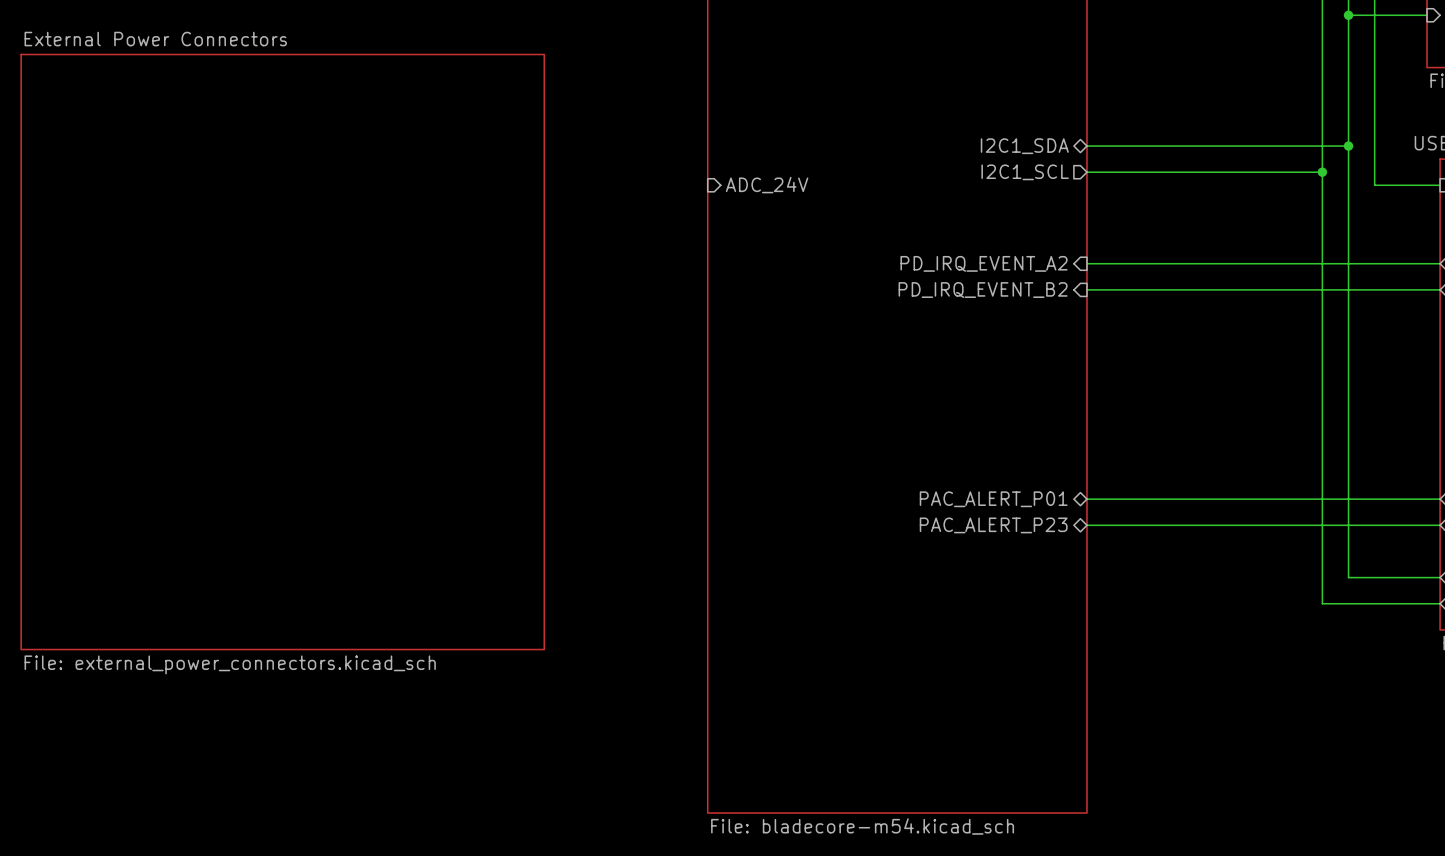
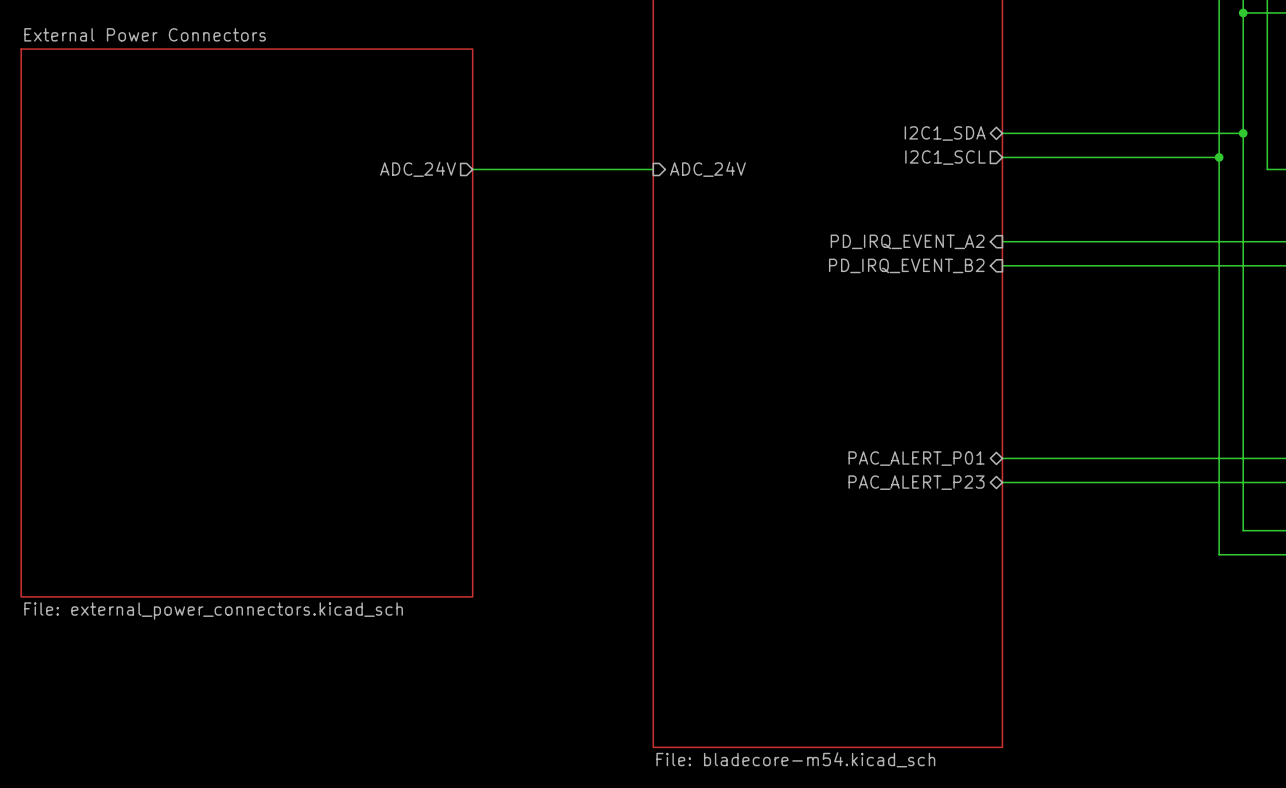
sheet pin: none -> ADC_24V (418, 169)
wire: none -> (472, 169) (653, 169)
sheet External Power Connectors: none -> File: external_power_connectors.kicad_sch (246, 322)
sheet External Power Connectors: File: external_power_connectors.kicad_sch (282, 352) -> none

